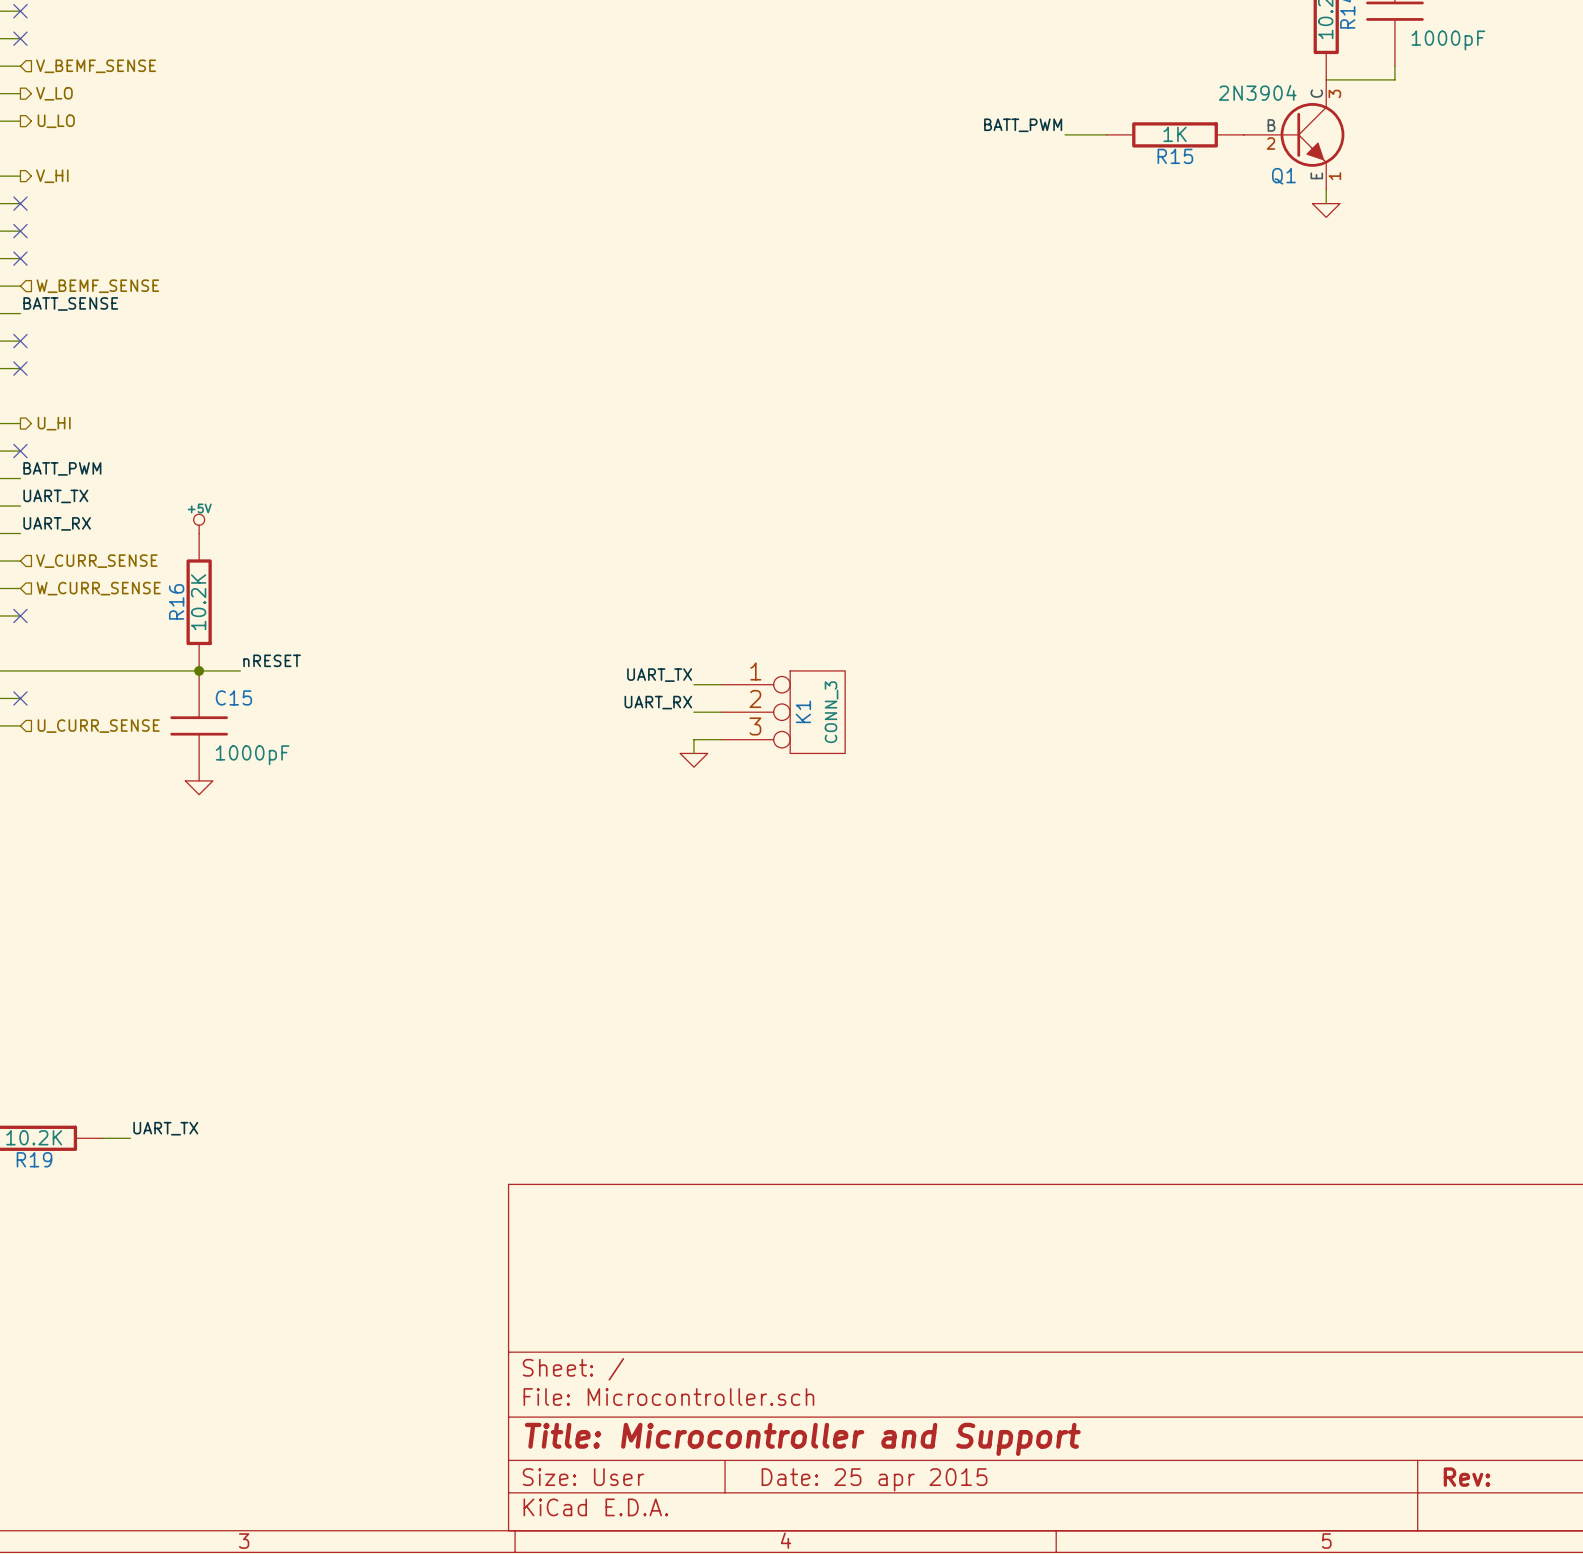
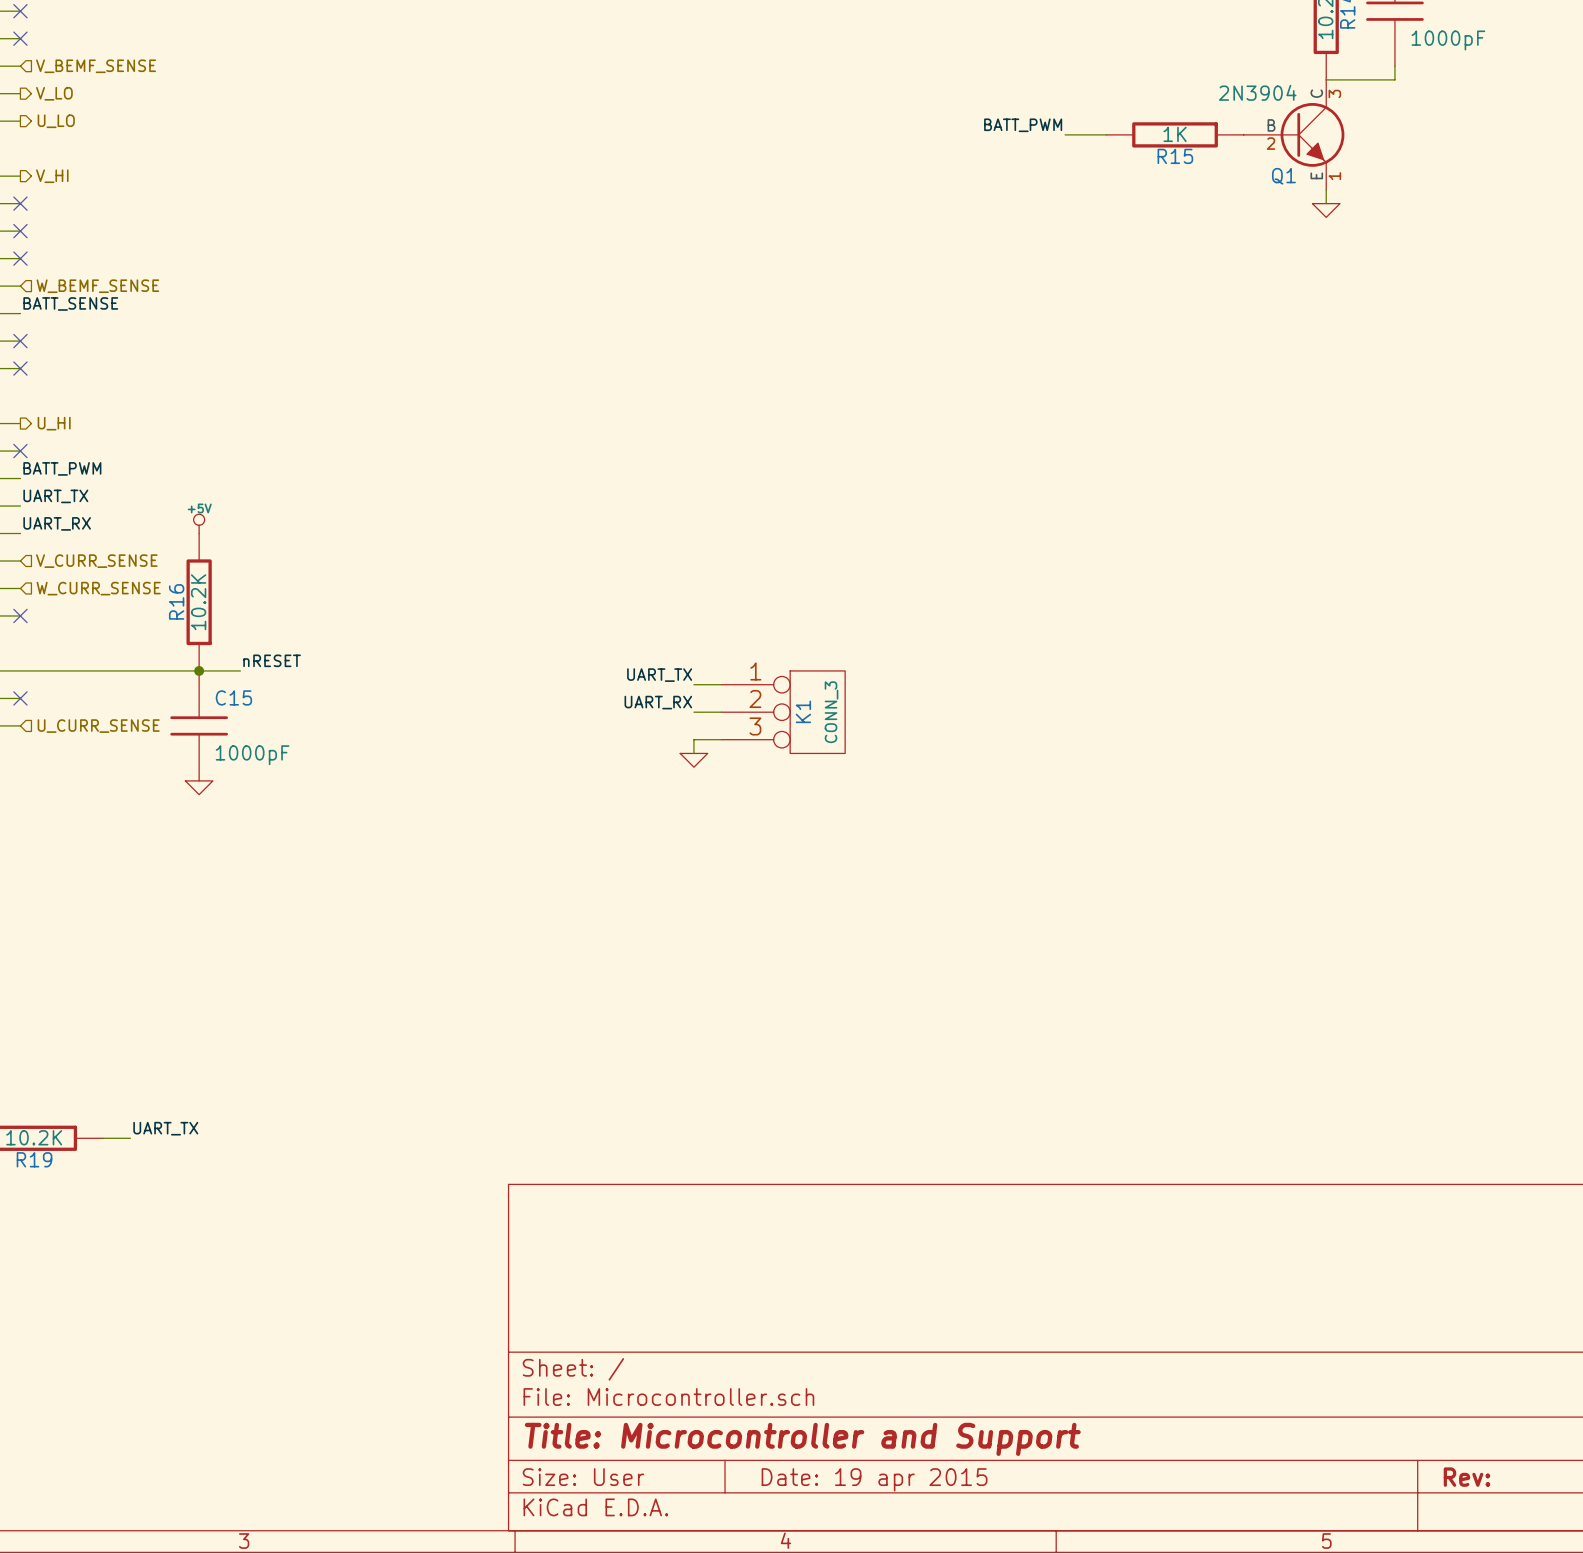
title block: Date: 25 apr 2015 (874, 1479) -> Date: 19 apr 2015 (874, 1479)

